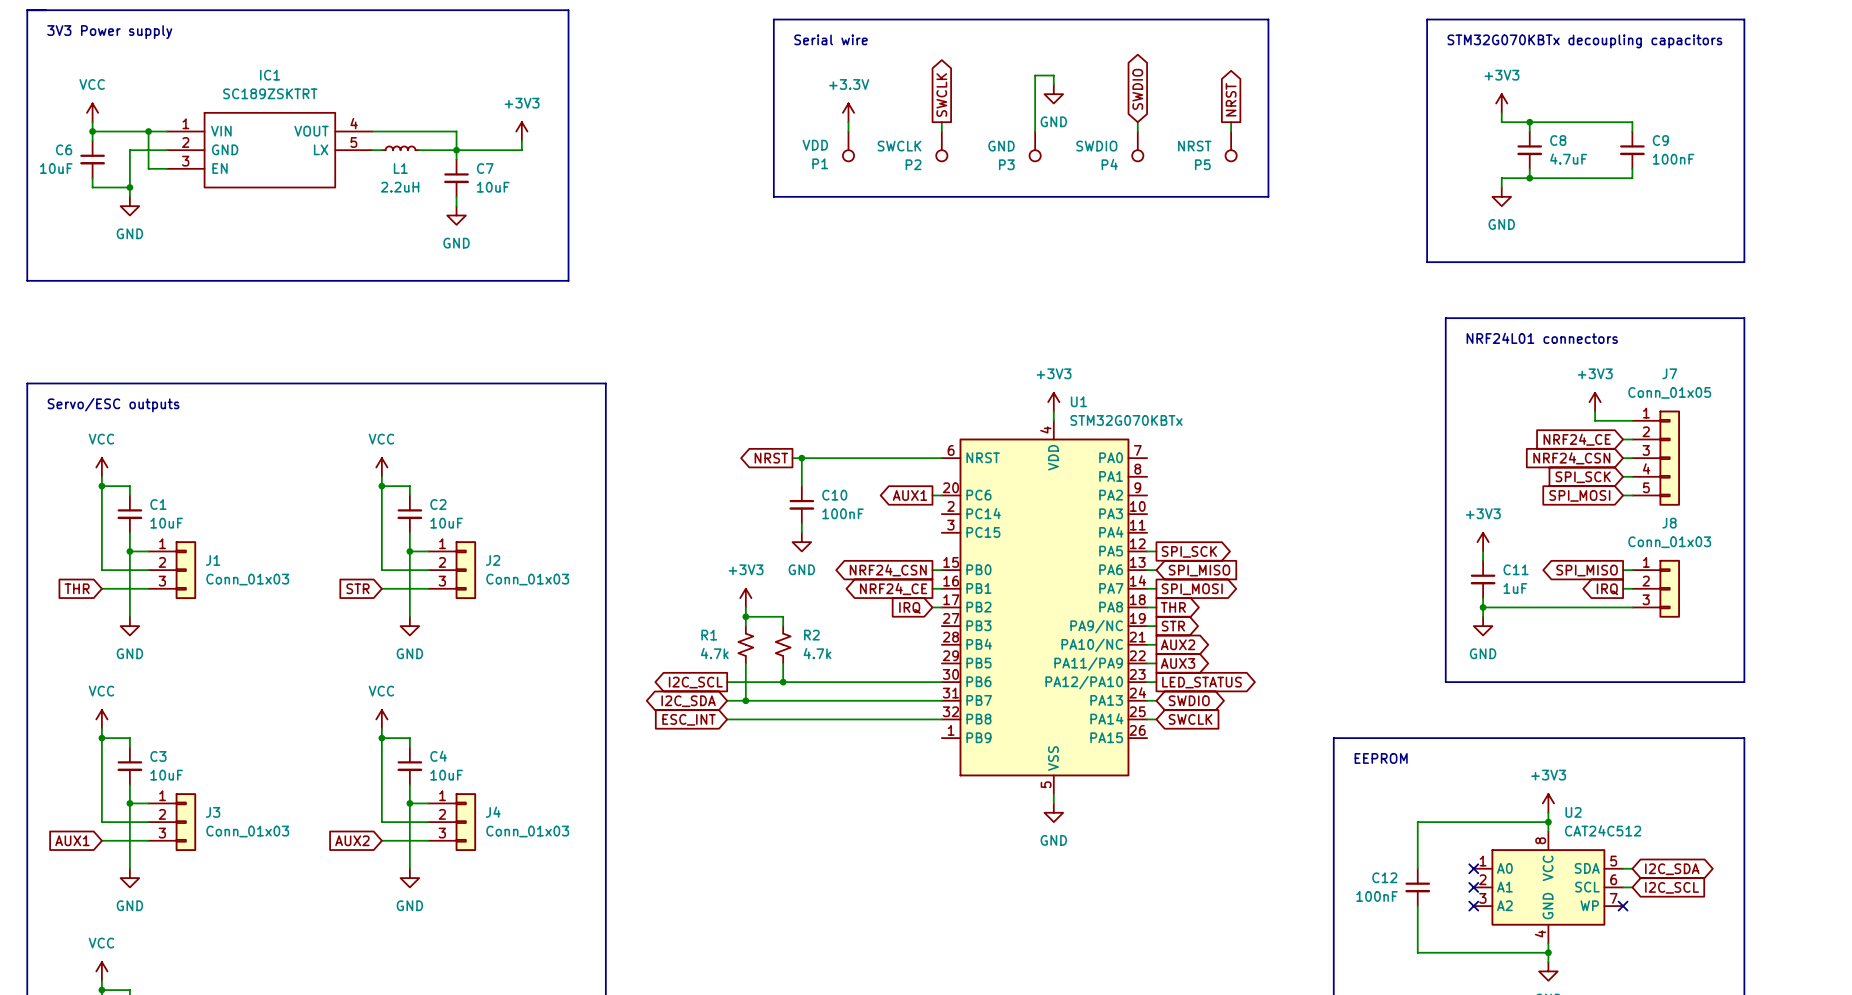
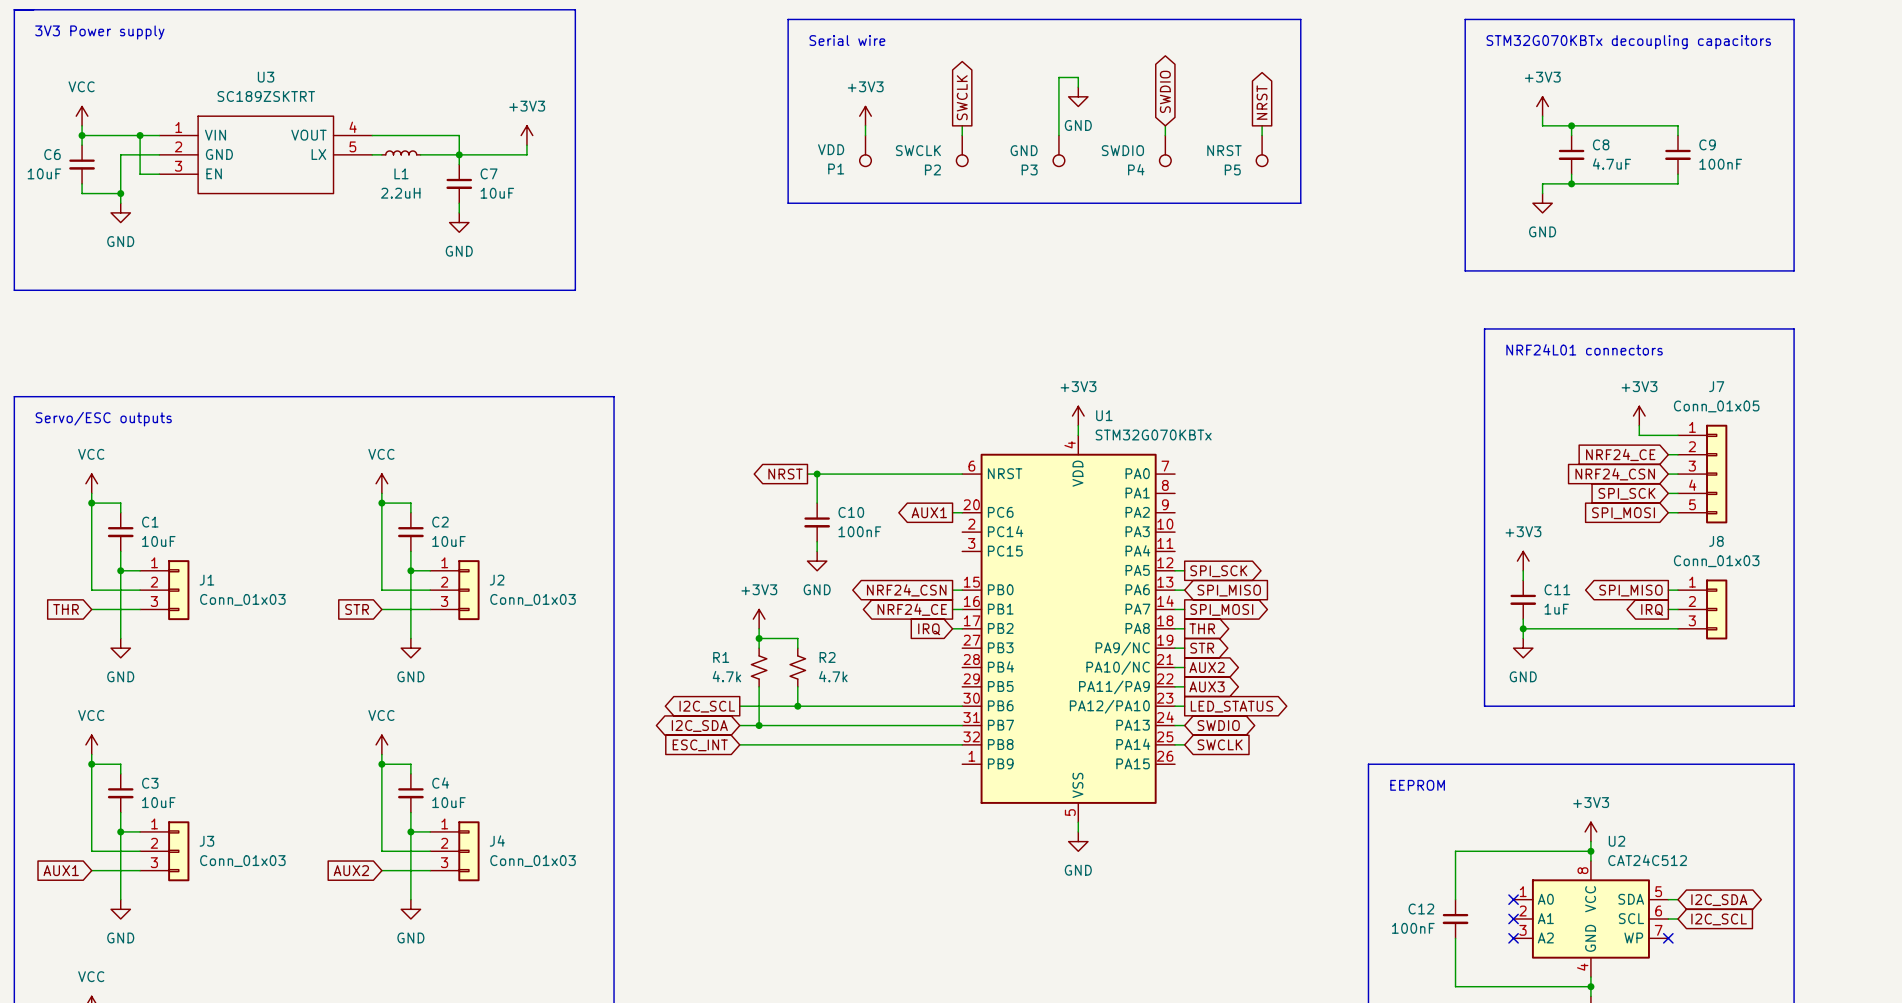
IC1 name: IC1 (270, 75) -> U3 (266, 77)
power symbol: +3.3V (848, 112) -> +3V3 (865, 116)

